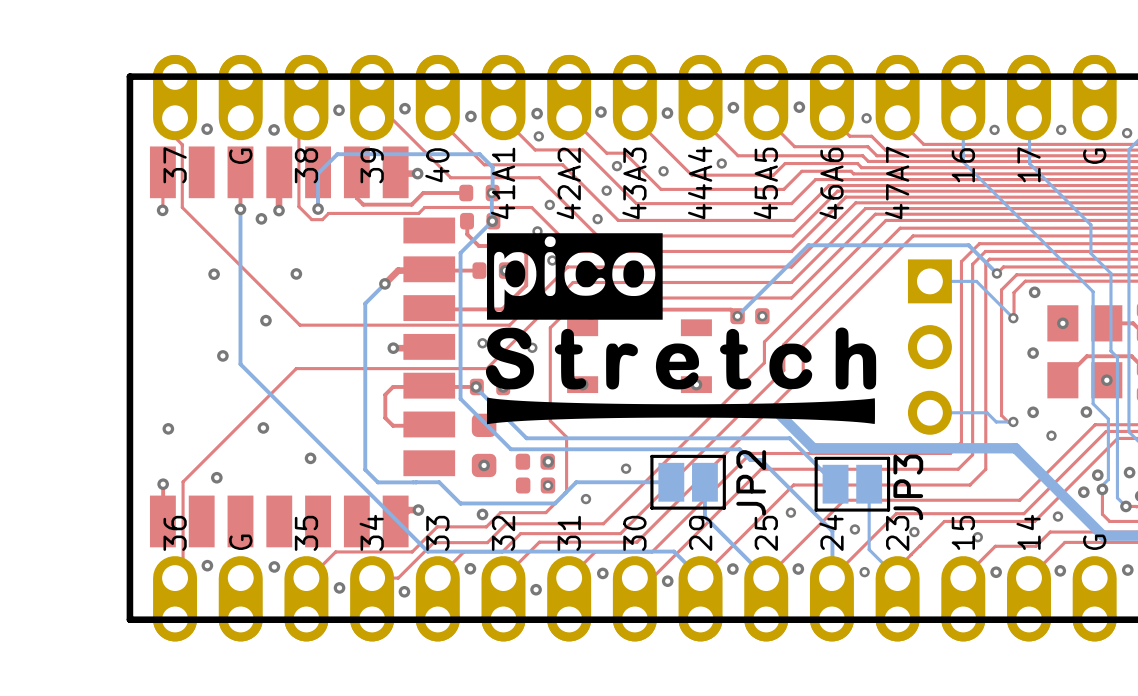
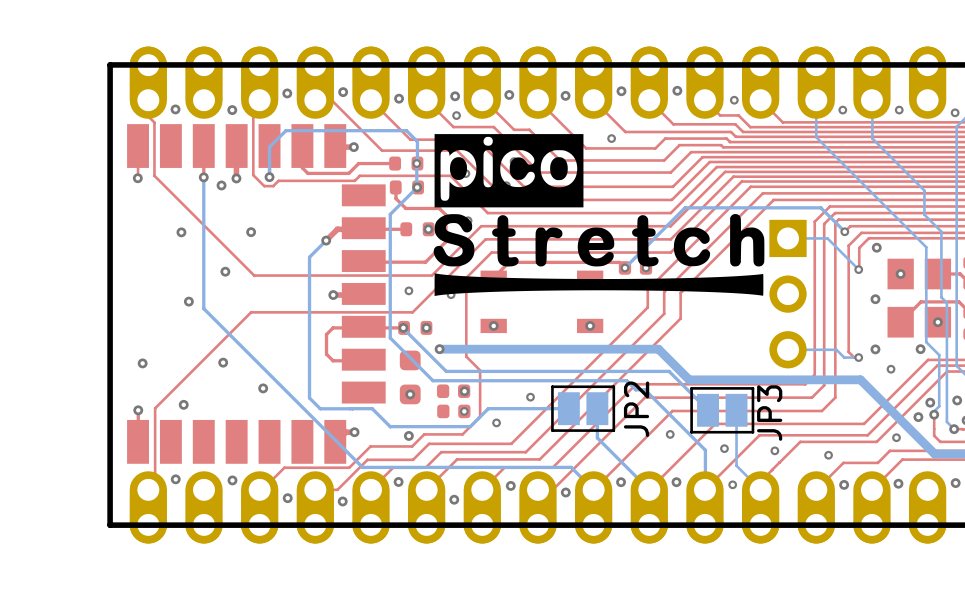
text: G (240, 156) -> none
text: G (1094, 156) -> none
text: 17 (1029, 164) -> none
text: 37 (175, 165) -> none
text: 38 (306, 165) -> none
text: 39 (372, 165) -> none
text: 40 (437, 165) -> none
text: 16 (963, 165) -> none
text: 44A4 (700, 182) -> none
text: 47A7 (897, 182) -> none
text: 41A1 (503, 183) -> none
text: 42A2 (568, 183) -> none
text: 43A3 (634, 183) -> none
text: 45A5 (765, 183) -> none
text: 46A6 (831, 183) -> none
drawing position: (681, 328) -> (599, 215)
text: 34 (371, 532) -> none
text: 24 (831, 532) -> none
text: 15 (963, 532) -> none
text: 14 (1028, 532) -> none
text: 36 (175, 533) -> none
text: 35 (306, 533) -> none
text: 33 (437, 533) -> none
text: 32 (503, 533) -> none
text: 31 (569, 533) -> none
text: 30 (634, 533) -> none
text: 29 (700, 533) -> none
text: 25 (766, 533) -> none
text: 23 (897, 533) -> none
text: G (240, 542) -> none
text: G (1094, 542) -> none

